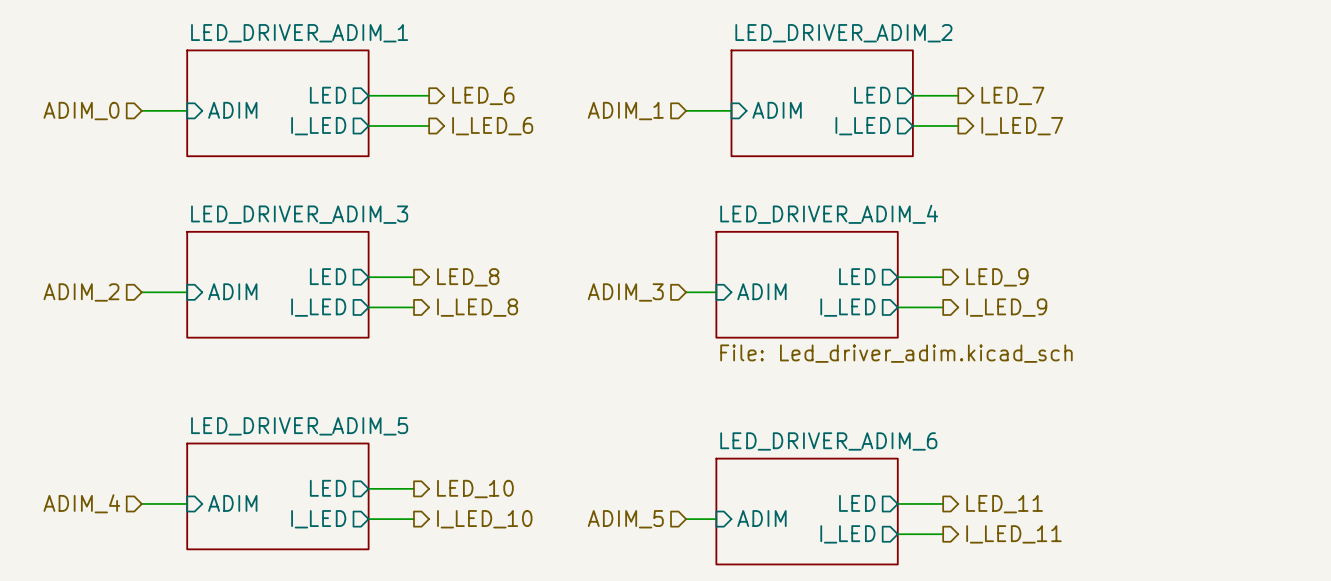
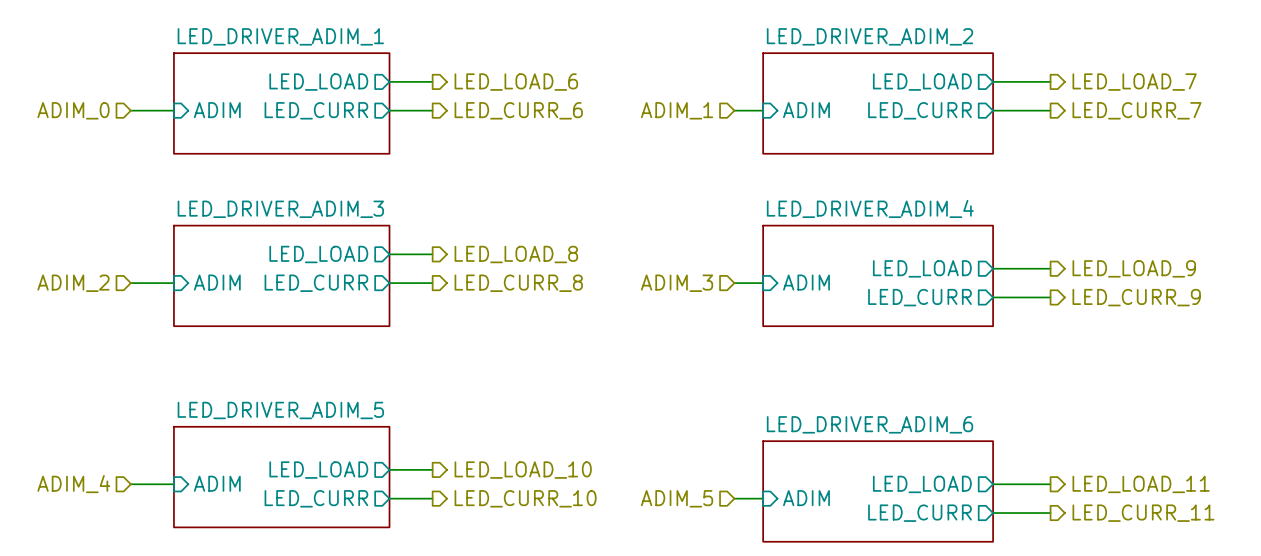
sheet LED_DRIVER_ADIM_2 name position: LED_DRIVER_ADIM_2 (843, 33) -> LED_DRIVER_ADIM_2 (870, 36)
sheet LED_DRIVER_ADIM_1 shape: [186, 49, 370, 158] -> [173, 52, 391, 155]
sheet LED_DRIVER_ADIM_2 shape: [730, 49, 914, 158] -> [762, 52, 994, 155]
sheet pin: none -> LED_LOAD (318, 82)
hierarchical label: none -> LED_LOAD_6 (516, 82)
sheet pin: none -> LED_LOAD (922, 82)
wire: none -> (993, 81) (1050, 81)
hierarchical label: none -> LED_LOAD_7 (1134, 82)
sheet pin: LED (328, 95) -> none
wire: (368, 95) (429, 95) -> none
hierarchical label: LED_6 (483, 95) -> none
sheet pin: LED (872, 95) -> none
wire: (912, 95) (958, 95) -> none
hierarchical label: LED_7 (1012, 95) -> none
wire: (686, 110) (731, 110) -> none
wire: none -> (734, 110) (763, 110)
sheet pin position: ADIM (777, 110) -> ADIM (806, 110)
wire: none -> (993, 110) (1050, 110)
sheet pin: none -> LED_CURR (316, 110)
hierarchical label: none -> LED_CURR_6 (518, 110)
hierarchical label position: ADIM_1 (625, 111) -> ADIM_1 (677, 110)
sheet pin: none -> LED_CURR (919, 110)
hierarchical label: none -> LED_CURR_7 (1137, 110)
sheet pin: I_LED (318, 126) -> none
wire: (368, 126) (429, 126) -> none
hierarchical label: I_LED_6 (492, 126) -> none
sheet pin: I_LED (863, 126) -> none
wire: (912, 126) (958, 126) -> none
hierarchical label: I_LED_7 (1022, 126) -> none
sheet LED_DRIVER_ADIM_4 name position: LED_DRIVER_ADIM_4 (829, 214) -> LED_DRIVER_ADIM_4 (870, 208)
sheet LED_DRIVER_ADIM_3 shape: [186, 230, 370, 339] -> [173, 224, 391, 328]
sheet LED_DRIVER_ADIM_4 shape: [715, 230, 899, 339] -> [762, 224, 994, 328]
sheet pin: none -> LED_LOAD (318, 254)
wire: none -> (389, 254) (432, 254)
hierarchical label: none -> LED_LOAD_8 (516, 254)
sheet pin: LED (328, 276) -> none
sheet pin: LED (857, 276) -> none
wire: (368, 277) (413, 277) -> (389, 81) (432, 81)
hierarchical label: LED_8 (468, 277) -> none
wire: (897, 277) (943, 277) -> none
sheet pin: none -> LED_LOAD (922, 268)
hierarchical label: LED_9 (997, 277) -> none
wire: none -> (993, 268) (1050, 268)
hierarchical label: none -> LED_LOAD_9 (1134, 268)
sheet pin position: ADIM (761, 291) -> ADIM (806, 282)
sheet pin: none -> LED_CURR (316, 283)
wire: none -> (389, 283) (432, 283)
hierarchical label: none -> LED_CURR_8 (518, 283)
hierarchical label position: ADIM_3 (625, 292) -> ADIM_3 (677, 283)
wire: (686, 292) (716, 292) -> (734, 283) (763, 283)
sheet pin: I_LED (318, 307) -> none
wire: (368, 307) (413, 307) -> (389, 110) (432, 110)
hierarchical label: I_LED_8 (477, 307) -> none
sheet pin: I_LED (847, 307) -> none
wire: (897, 307) (943, 307) -> none
sheet pin: none -> LED_CURR (919, 297)
hierarchical label: I_LED_9 (1006, 307) -> none
wire: none -> (993, 297) (1050, 297)
hierarchical label: none -> LED_CURR_9 (1136, 297)
sheet LED_DRIVER_ADIM_4 value: File: Led_driver_adim.kicad_sch (896, 353) -> none
sheet LED_DRIVER_ADIM_6 name position: LED_DRIVER_ADIM_6 (828, 441) -> LED_DRIVER_ADIM_6 (870, 424)
sheet LED_DRIVER_ADIM_5 shape: [186, 442, 370, 551] -> [173, 425, 391, 529]
sheet LED_DRIVER_ADIM_6 shape: [715, 457, 899, 566] -> [762, 440, 994, 543]
sheet pin: LED (328, 488) -> none
wire: (368, 488) (413, 488) -> (432, 469) (389, 469)
sheet pin: none -> LED_LOAD (318, 470)
hierarchical label: LED_10 (475, 489) -> none
hierarchical label: none -> LED_LOAD_10 (523, 470)
sheet pin: LED (857, 503) -> none
wire: (897, 503) (943, 503) -> none
wire: none -> (993, 484) (1050, 484)
sheet pin: none -> LED_LOAD (922, 484)
hierarchical label: LED_11 (1004, 504) -> none
hierarchical label: none -> LED_LOAD_11 (1141, 484)
sheet pin position: ADIM (761, 518) -> ADIM (806, 498)
sheet pin: I_LED (318, 519) -> none
sheet pin: none -> LED_CURR (316, 498)
wire: (368, 519) (413, 519) -> (432, 498) (389, 498)
hierarchical label: I_LED_10 (484, 519) -> none
hierarchical label: none -> LED_CURR_10 (525, 498)
hierarchical label position: ADIM_5 (625, 519) -> ADIM_5 (677, 498)
wire: (686, 519) (716, 519) -> (734, 498) (763, 498)
sheet pin: I_LED (847, 534) -> none
wire: (897, 534) (943, 534) -> none
sheet pin: none -> LED_CURR (919, 513)
hierarchical label: I_LED_11 (1013, 534) -> none
wire: none -> (993, 513) (1050, 513)
hierarchical label: none -> LED_CURR_11 (1143, 513)

